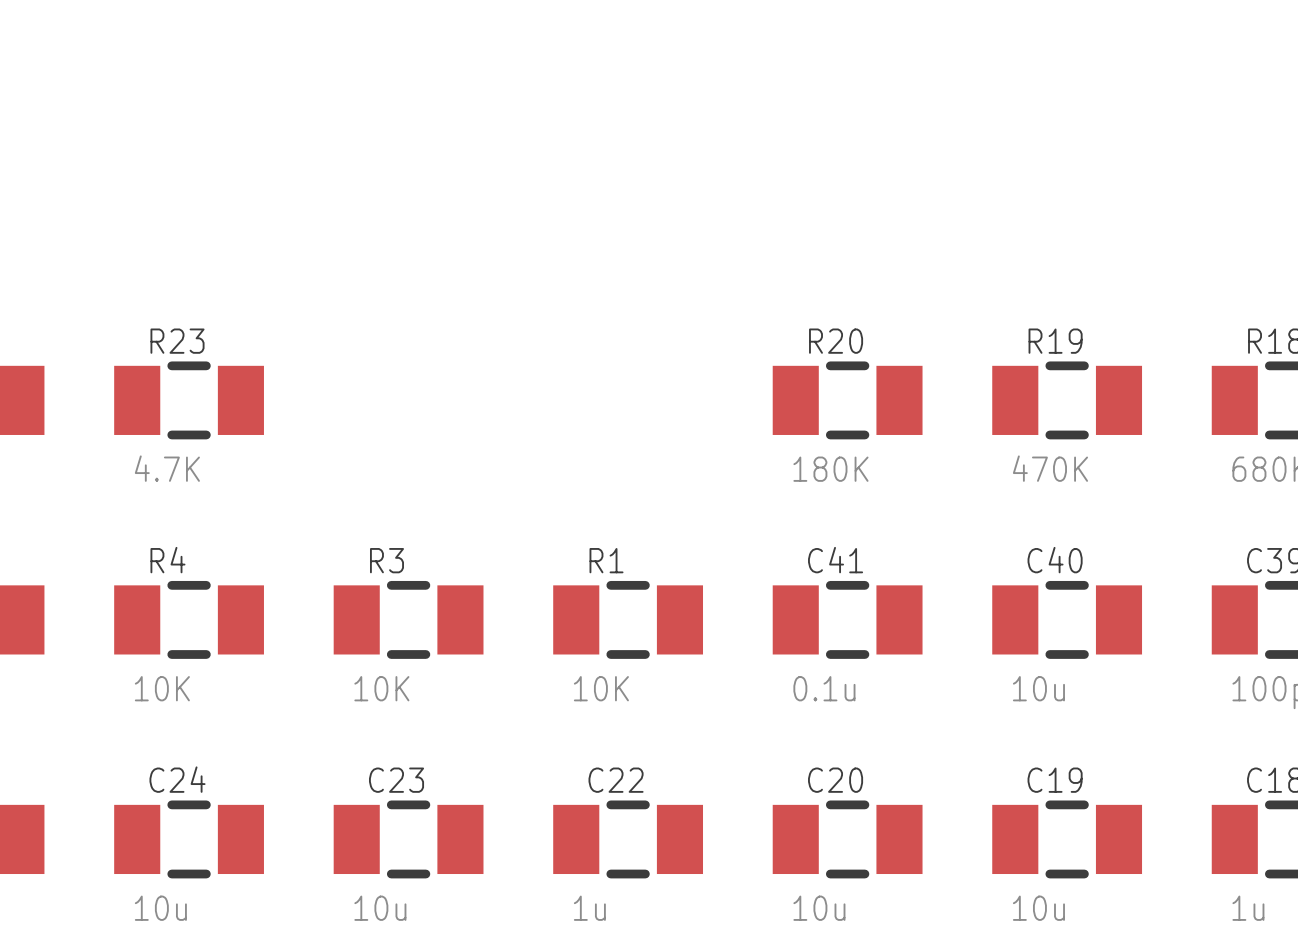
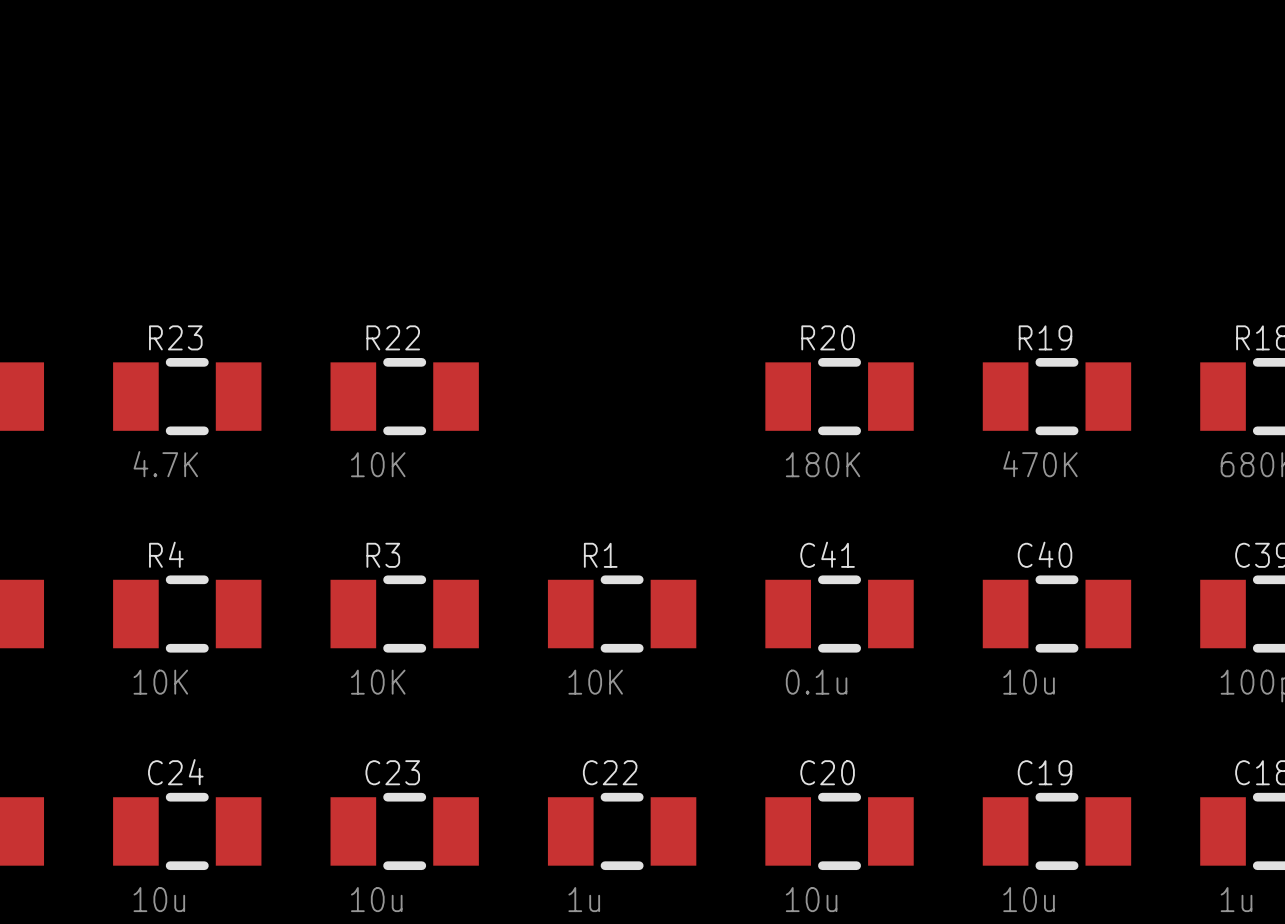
R22: none -> 10K (404, 396)

